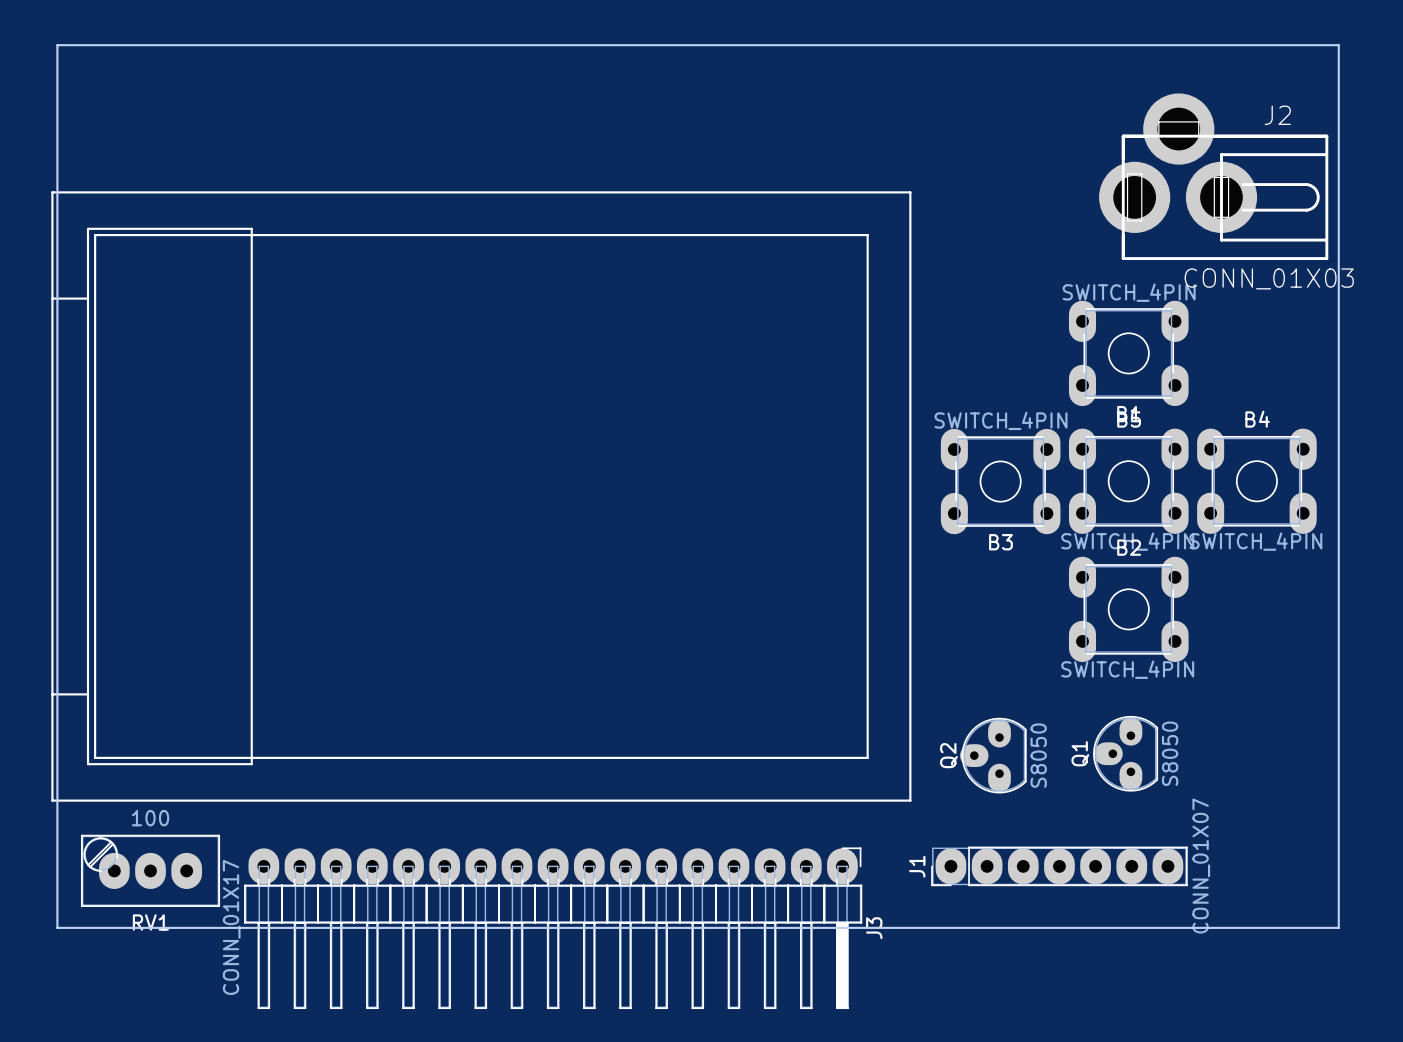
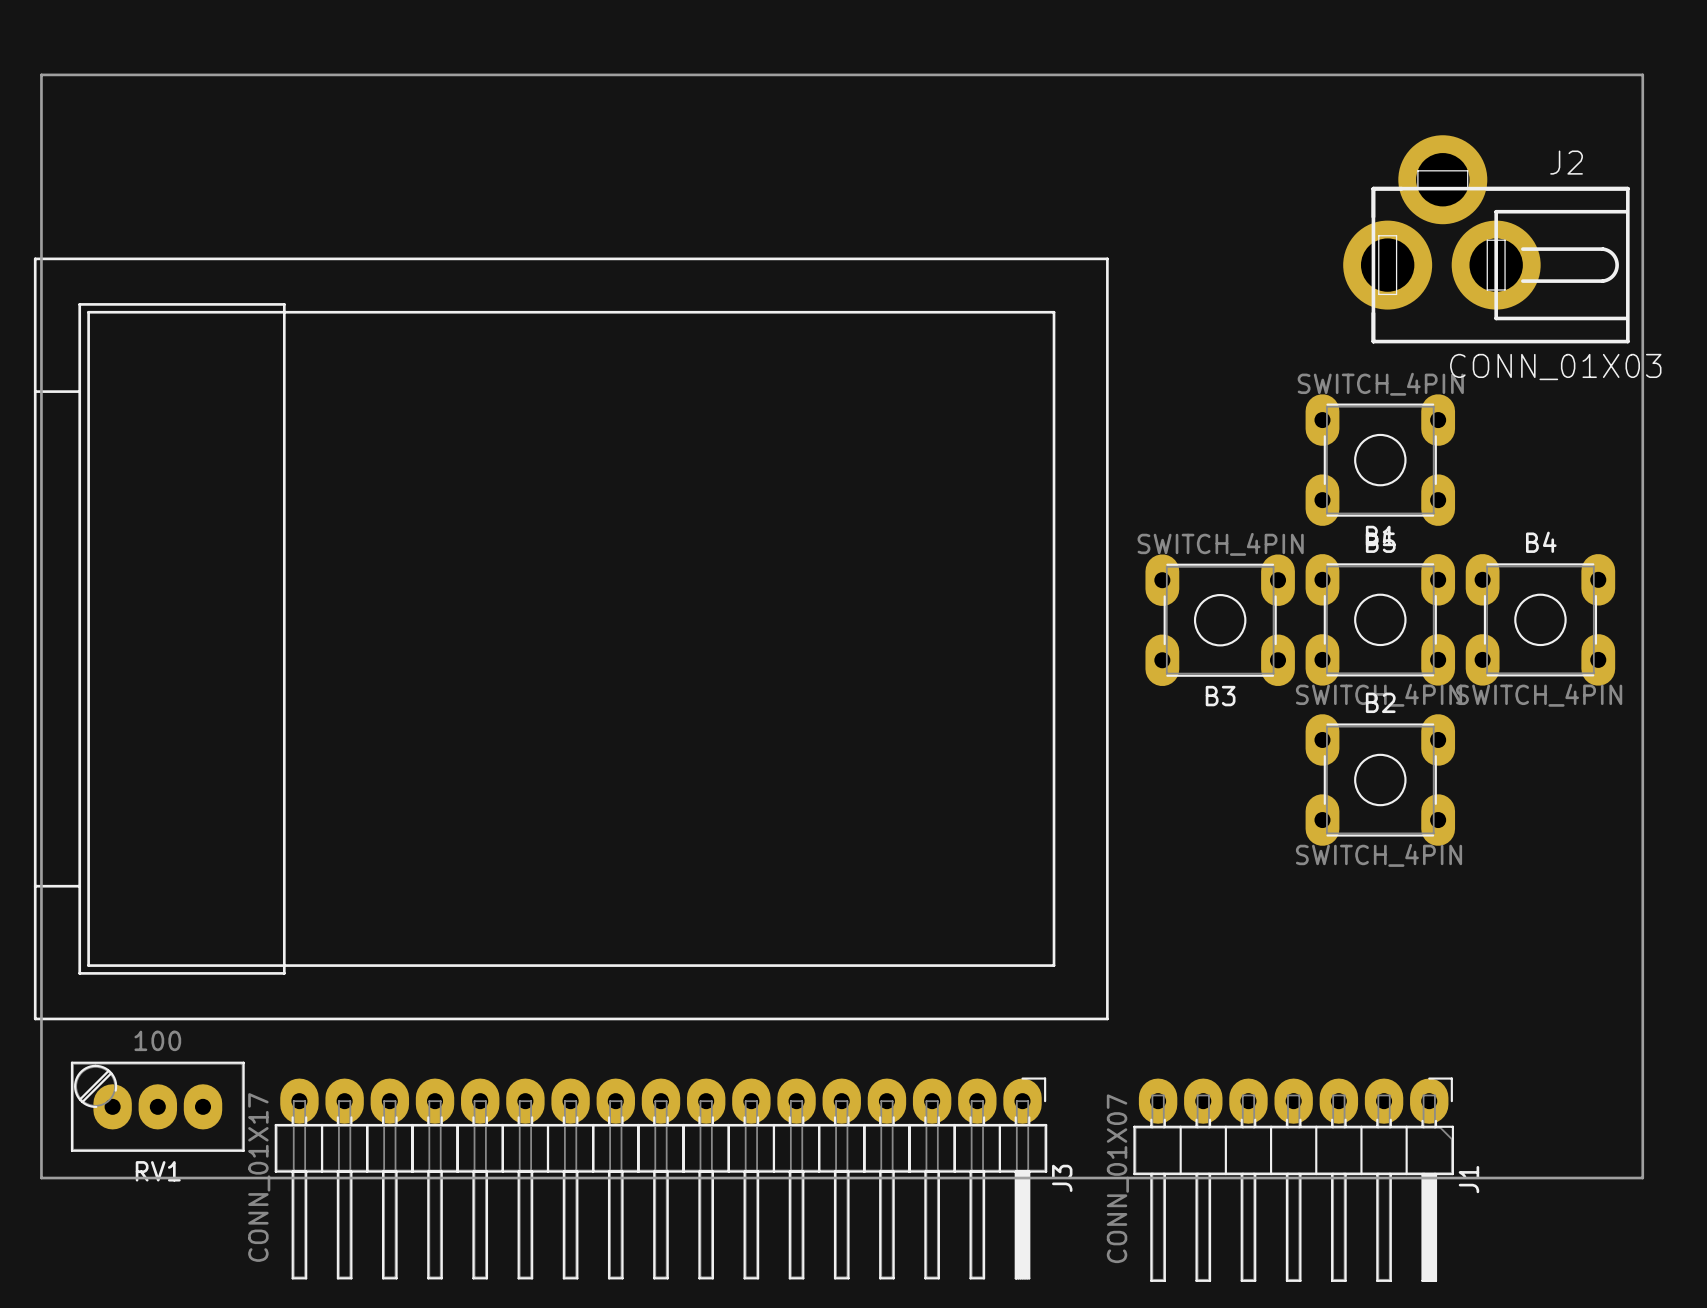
Q1: S8050 (1125, 753) -> none
Q2: S8050 (993, 755) -> none
J1 footprint: [931, 846, 1188, 887] -> [1133, 1077, 1454, 1282]
J1 name position: J1 (917, 866) -> J1 (1468, 1179)
J1 value position: CONN_01X07 (1201, 866) -> CONN_01X07 (1117, 1178)

